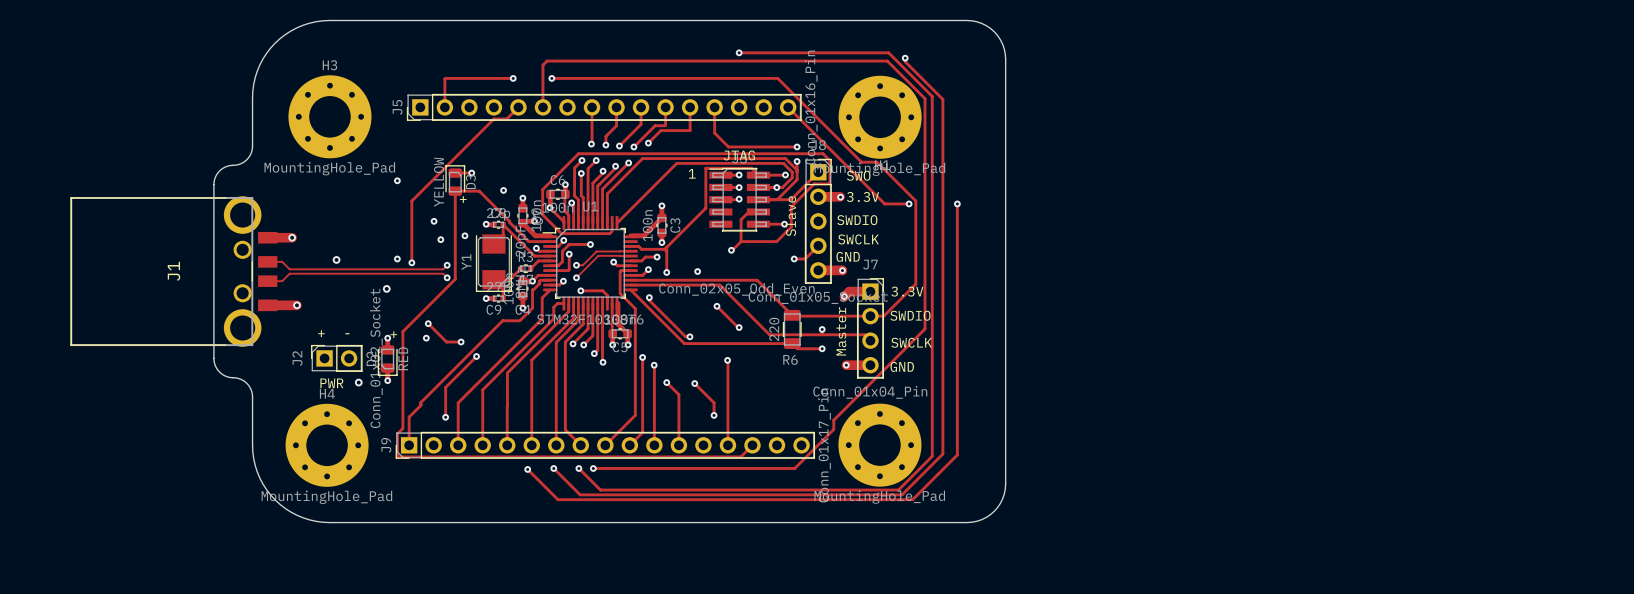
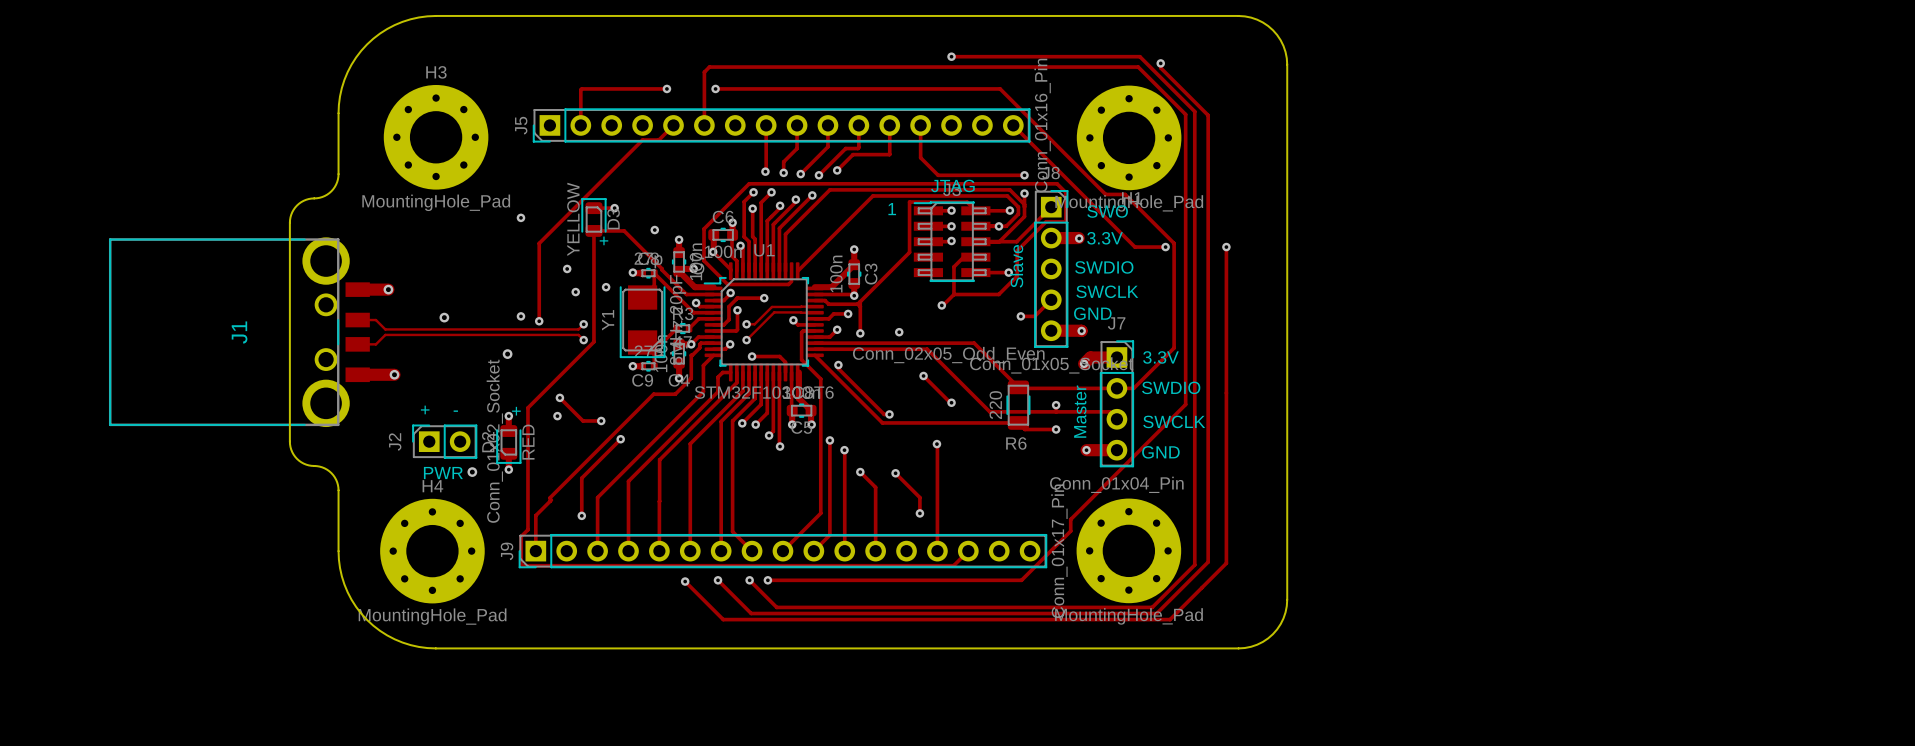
track: none -> (814, 294) (854, 295)

